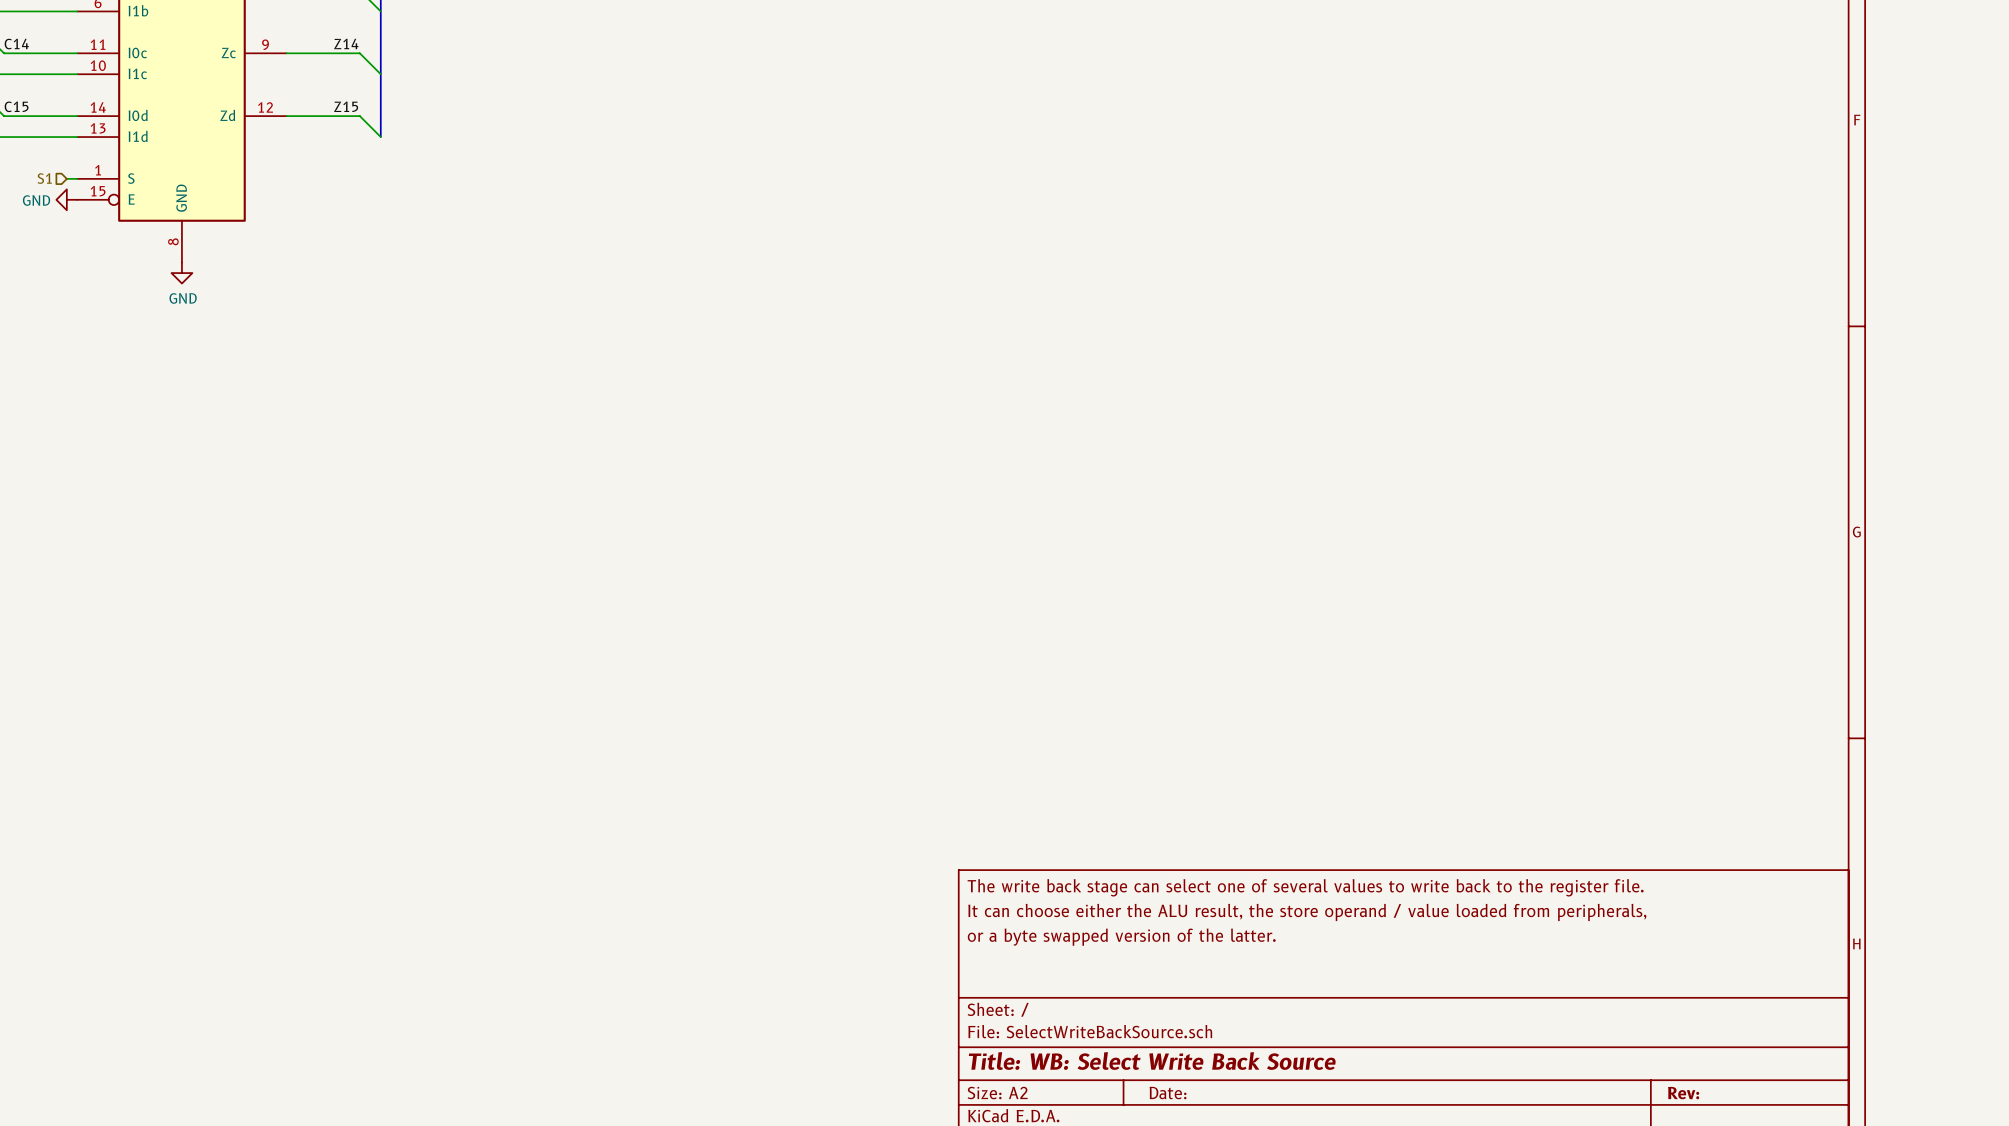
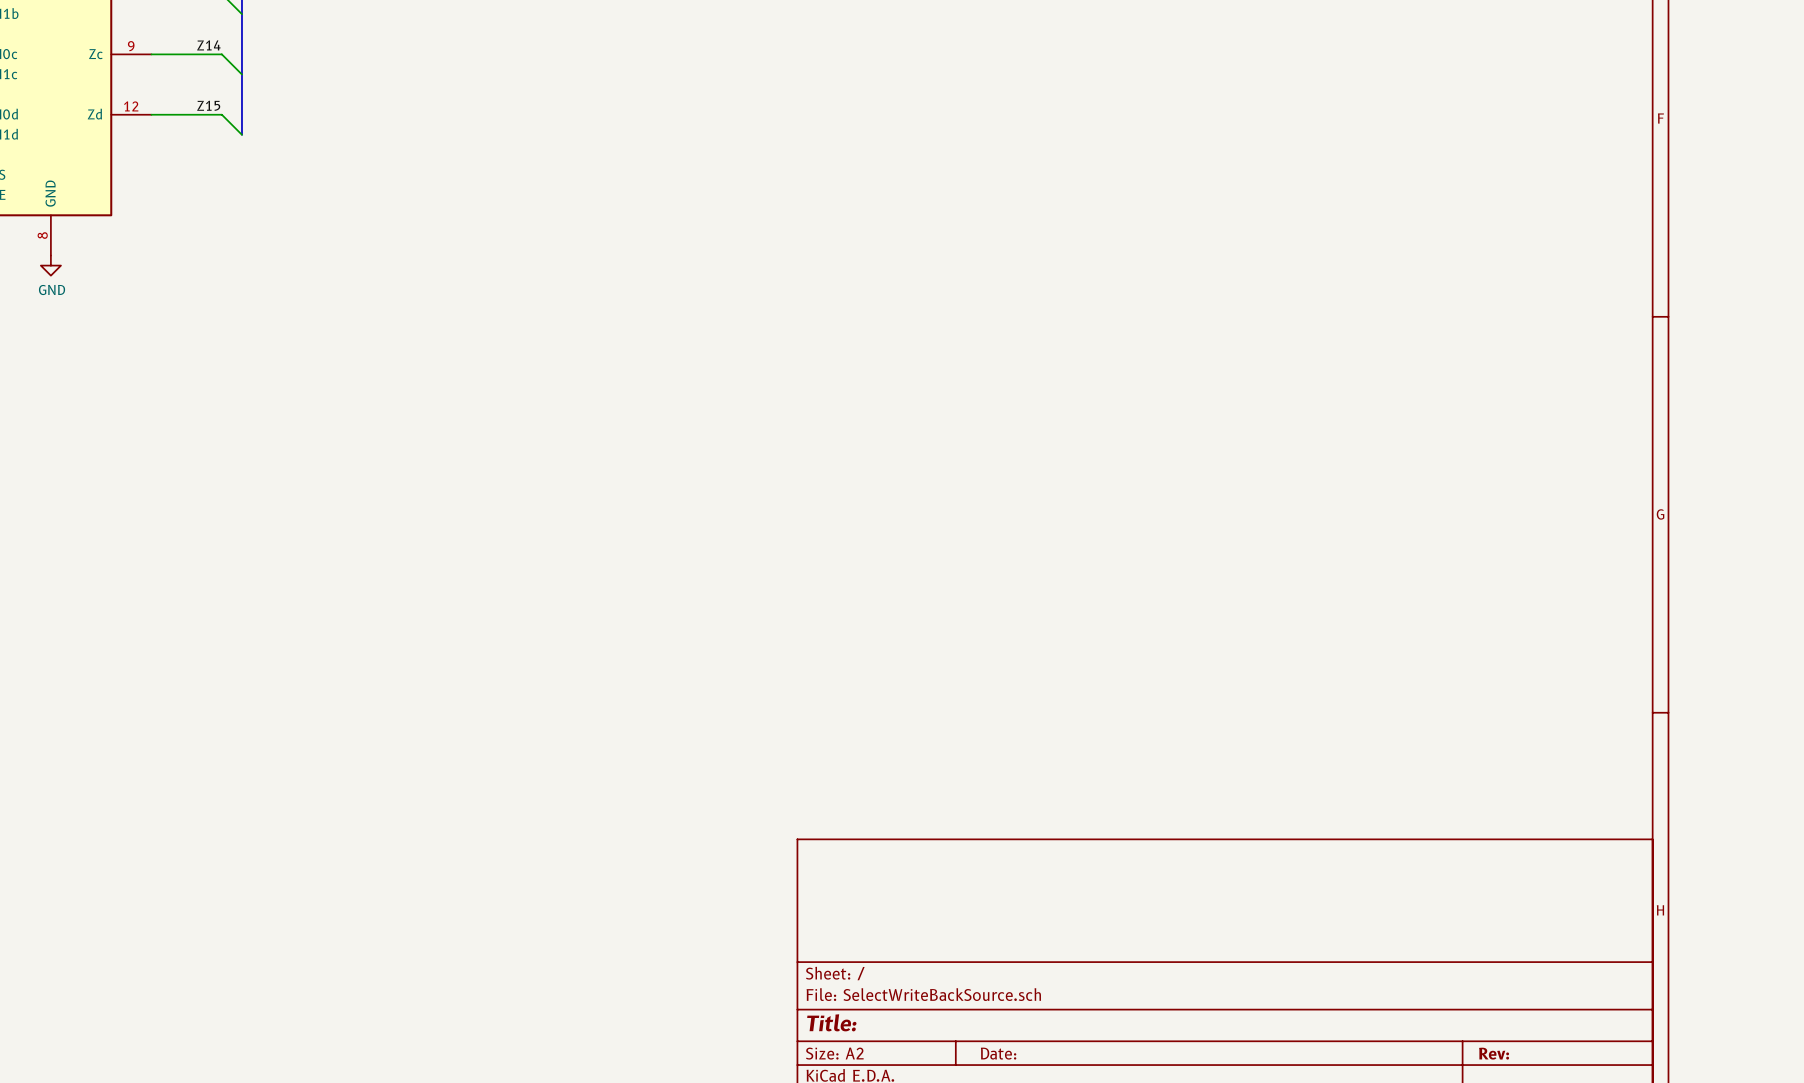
title block: The write back stage can select one of several values to write back to the register file. (1305, 887) -> none
title block: It can choose either the ALU result, the store operand / value loaded from peripherals, (1307, 912) -> none
title block: or a byte swapped version of the latter. (1121, 937) -> none
title block: Title: WB: Select Write Back Source (1152, 1060) -> Title: (831, 1022)

